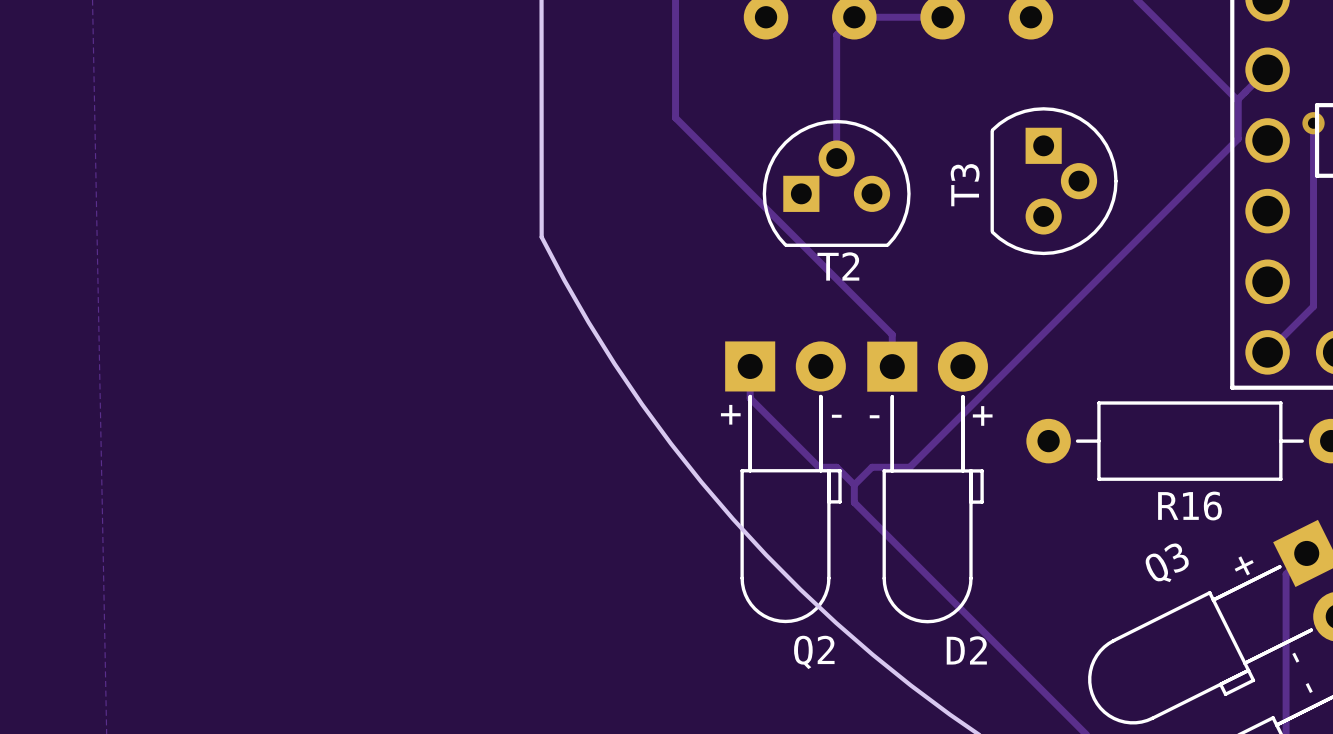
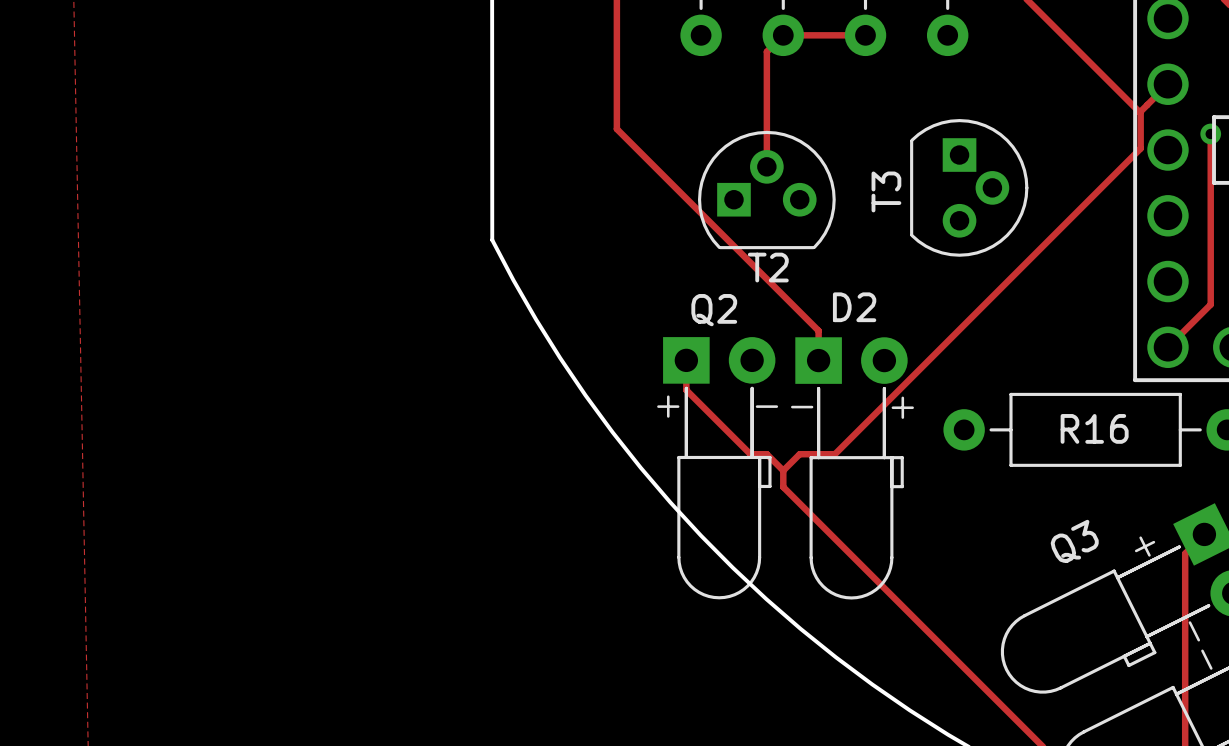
R16 name position: R16 (1189, 506) -> R16 (1094, 428)
D2 name position: D2 (966, 650) -> D2 (854, 307)
Q2 name position: Q2 (814, 652) -> Q2 (714, 310)

